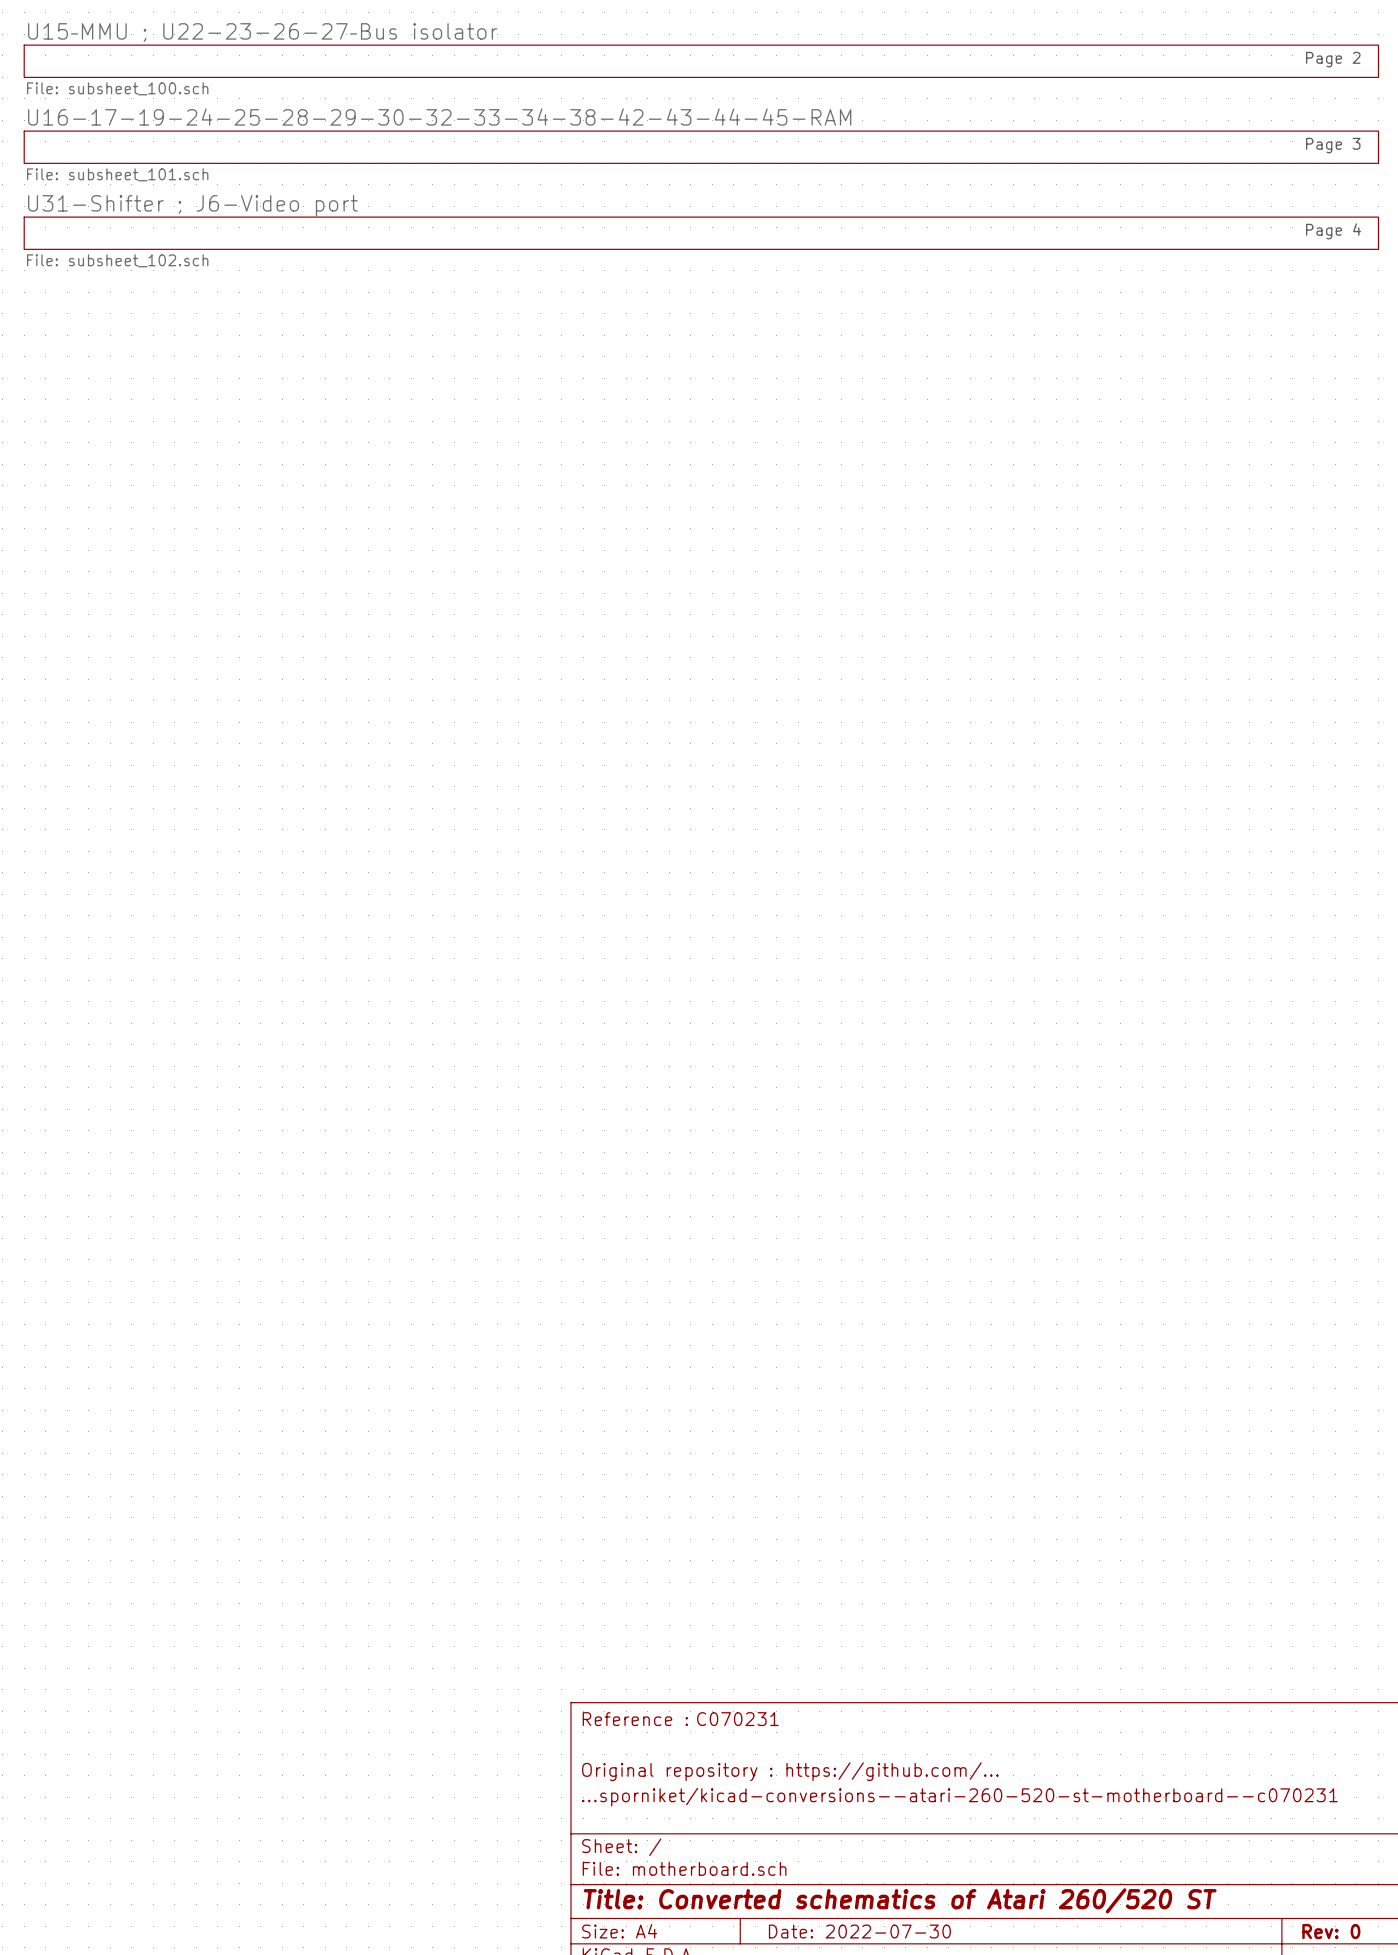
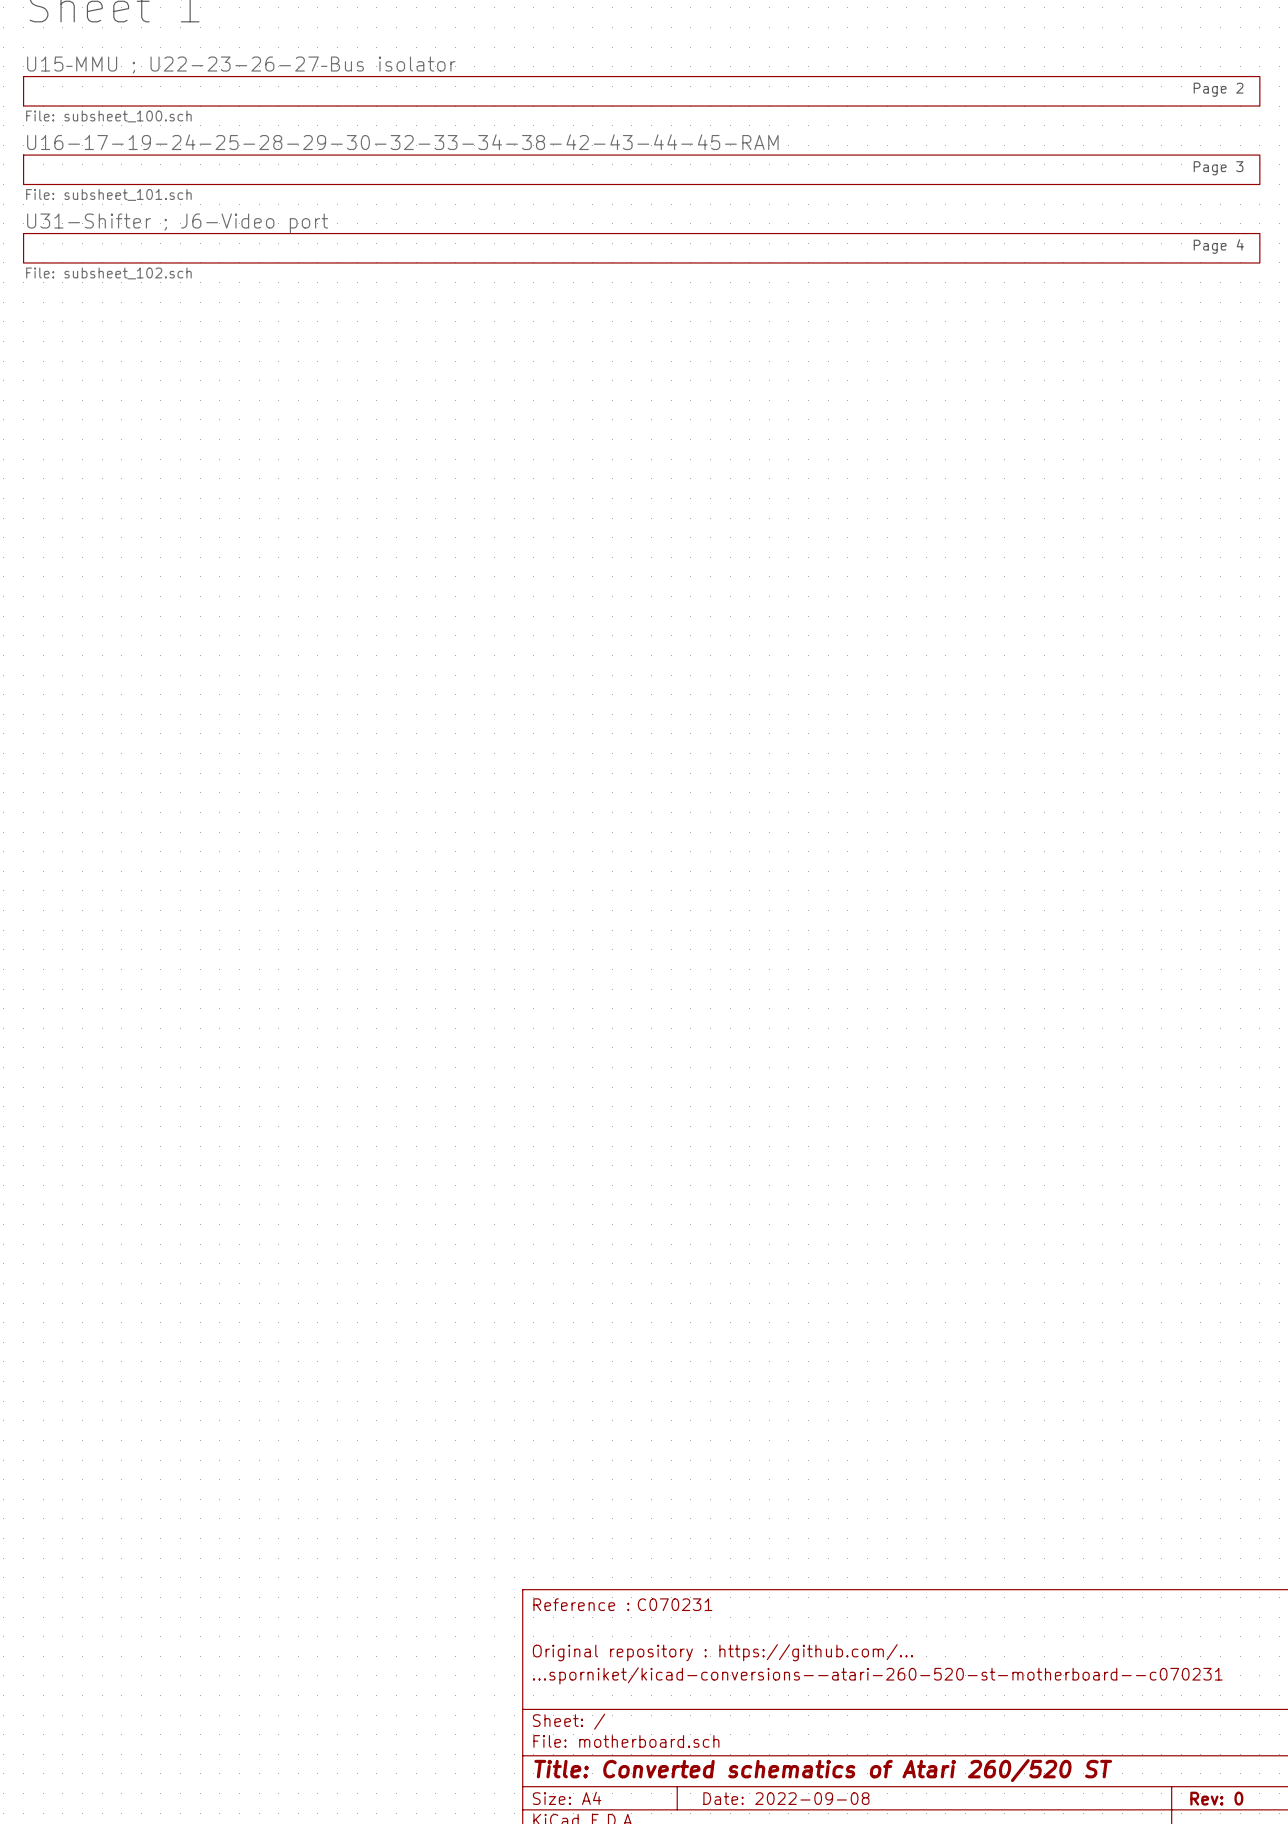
title block: Date: 2022-07-30 (859, 1931) -> Date: 2022-09-08 (786, 1798)

